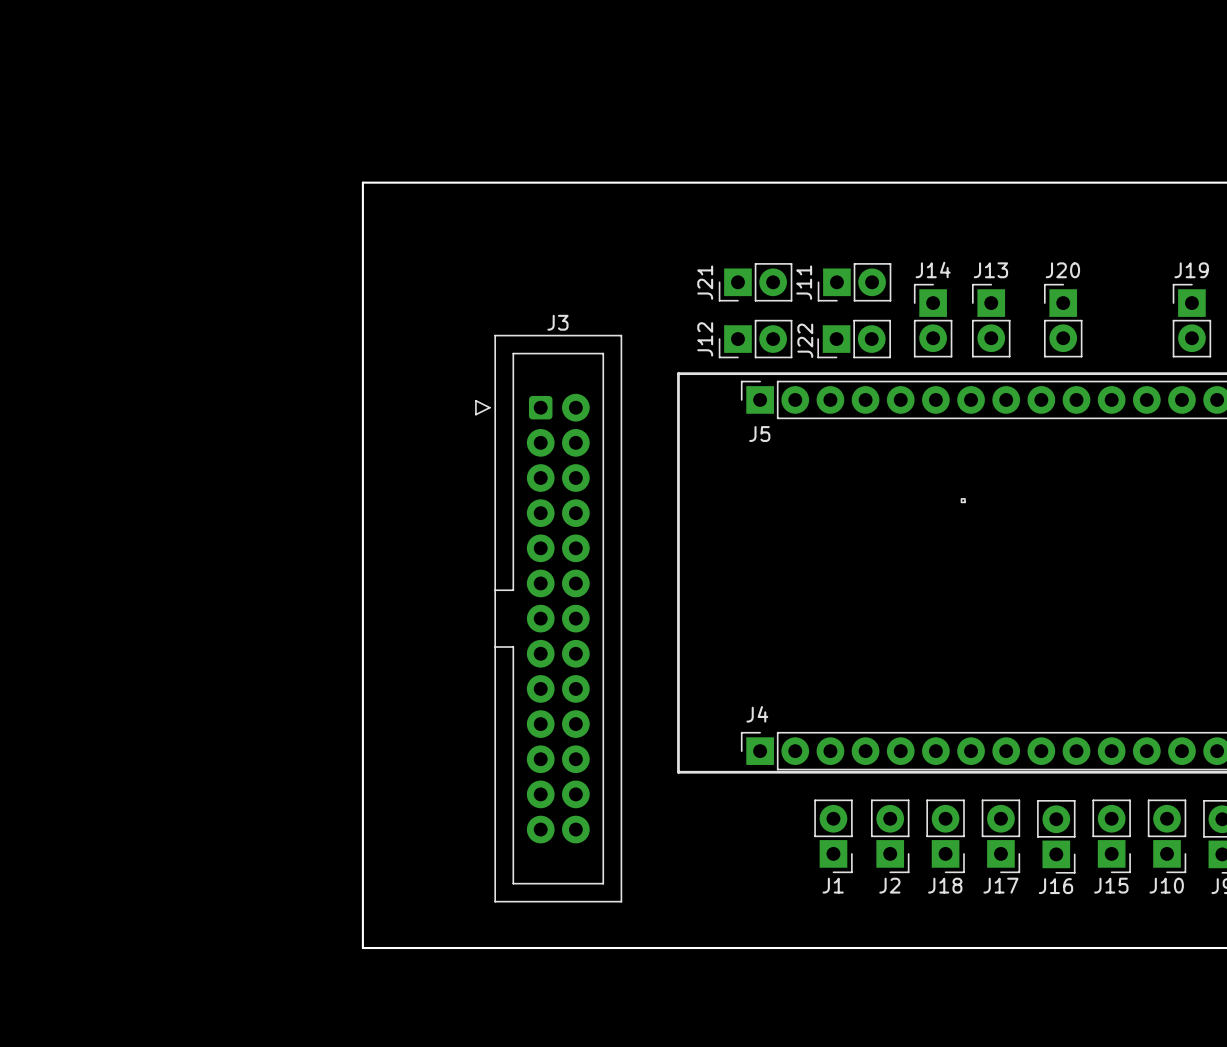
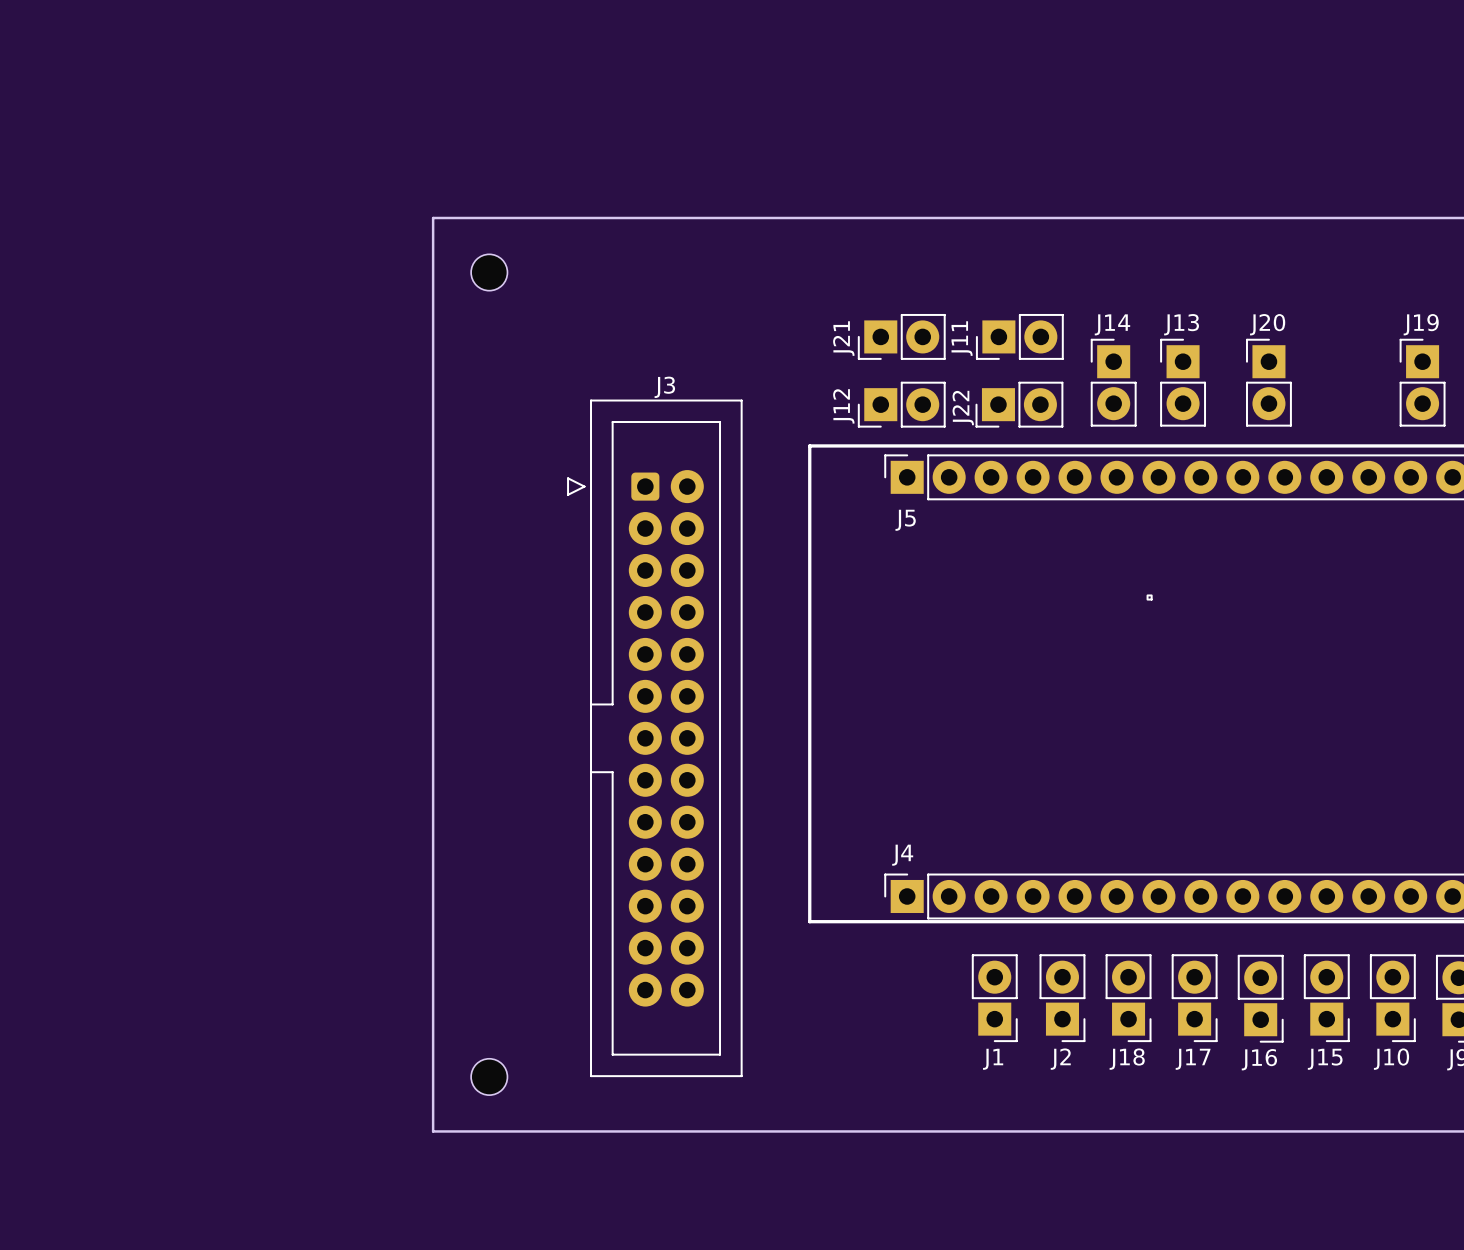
part: none -> (489, 272)
part: none -> (489, 1076)

